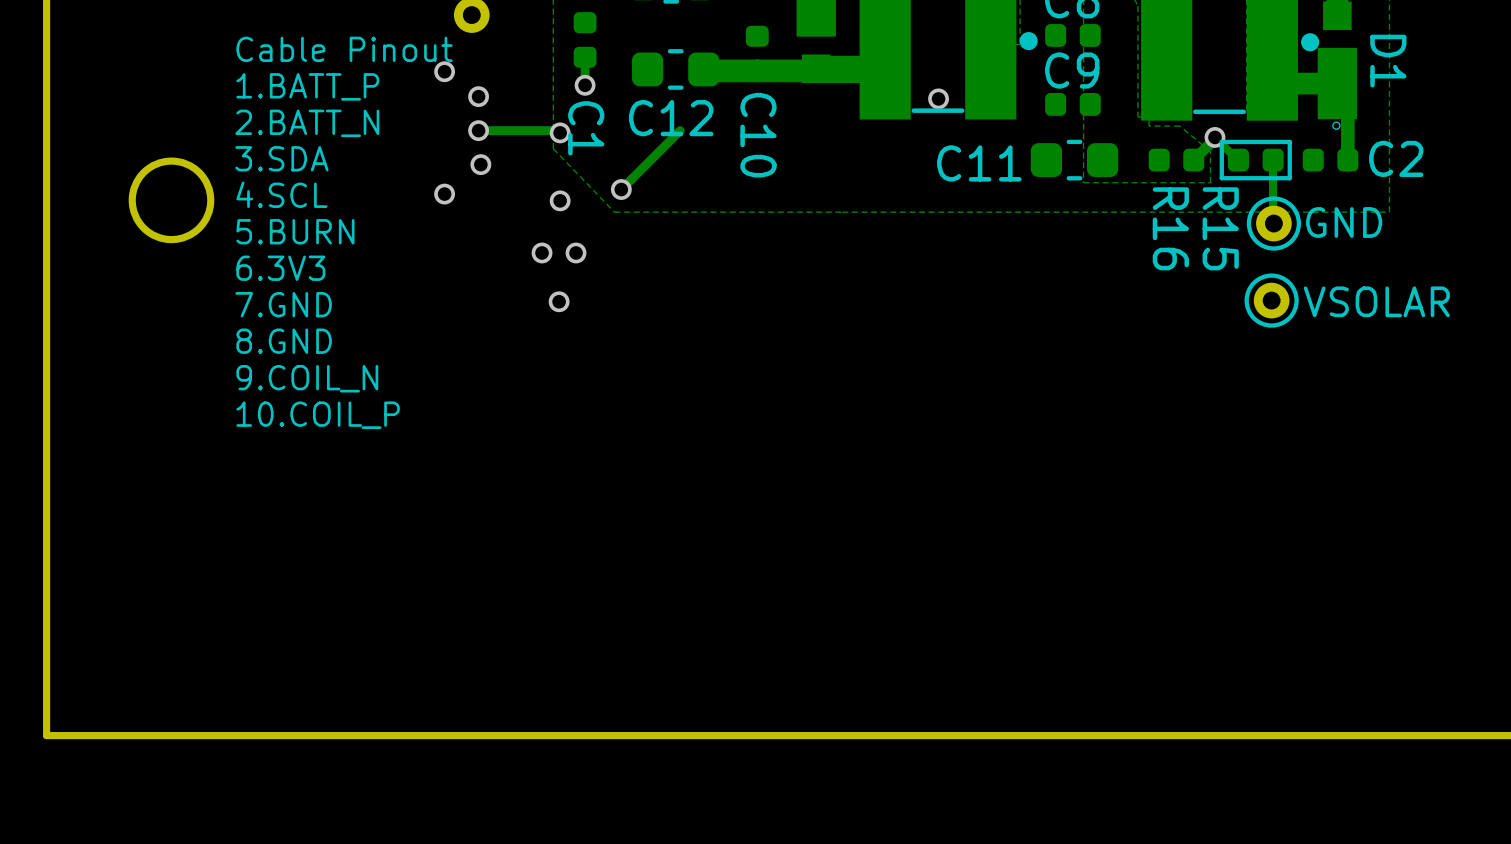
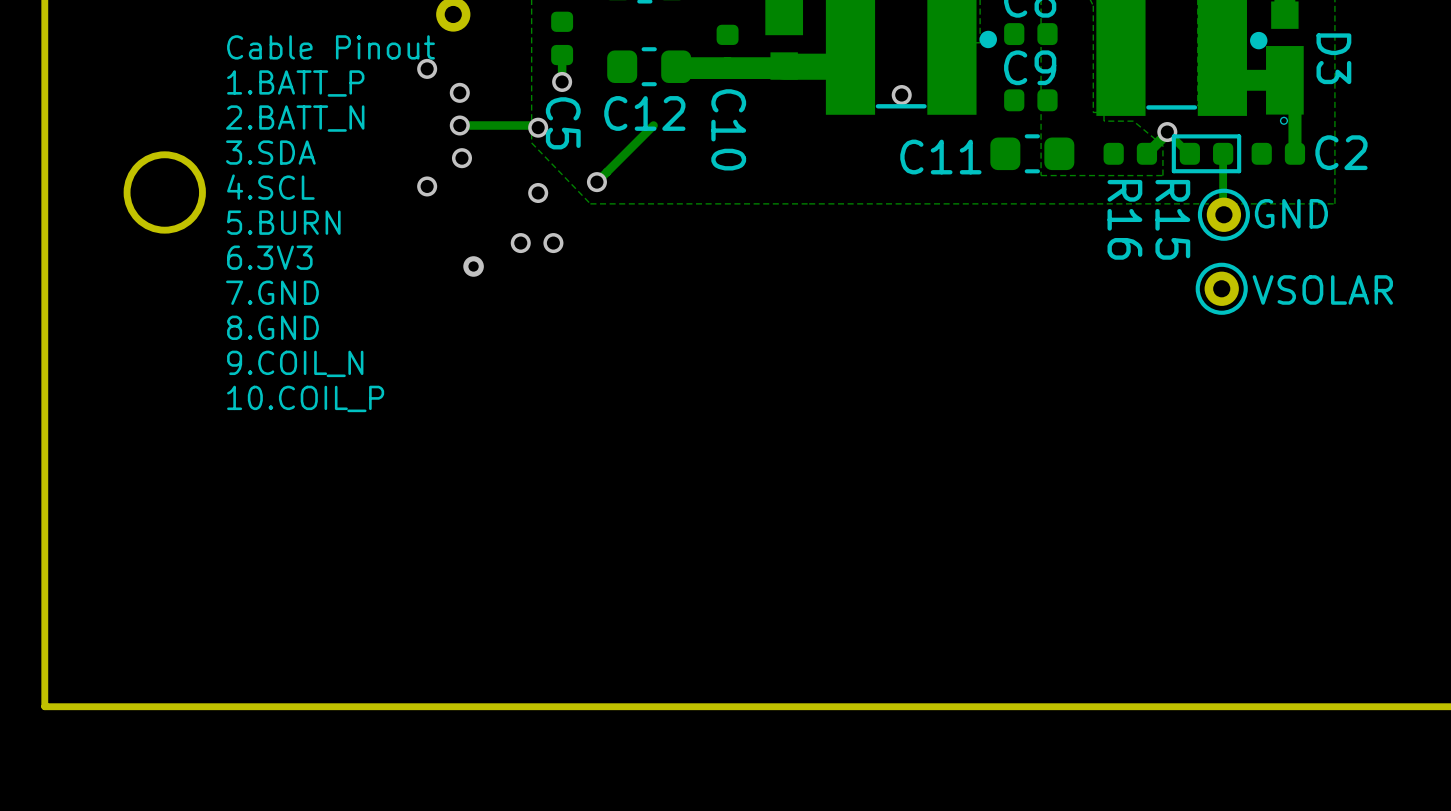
D1 name: D1 (1388, 61) -> D3 (1333, 58)
C1 name: C1 (586, 128) -> C5 (563, 123)
via: none -> (473, 266)
via: (559, 301) -> none

